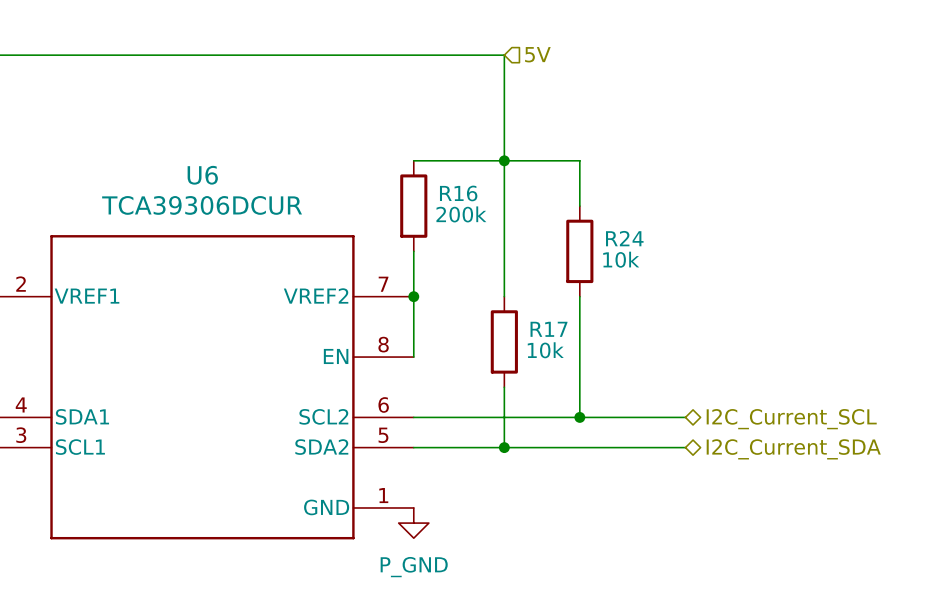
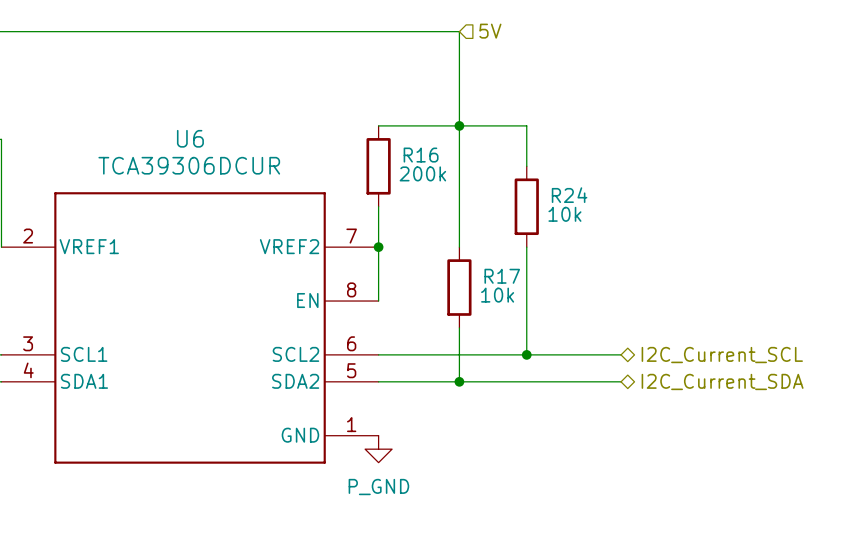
U6 pin number: 4 (21, 404) -> 3 (28, 343)
U6 pin name: SDA1 (82, 416) -> SCL1 (84, 354)
U6 pin number: 3 (21, 435) -> 4 (28, 370)
U6 pin name: SCL1 (80, 447) -> SDA1 (84, 381)

